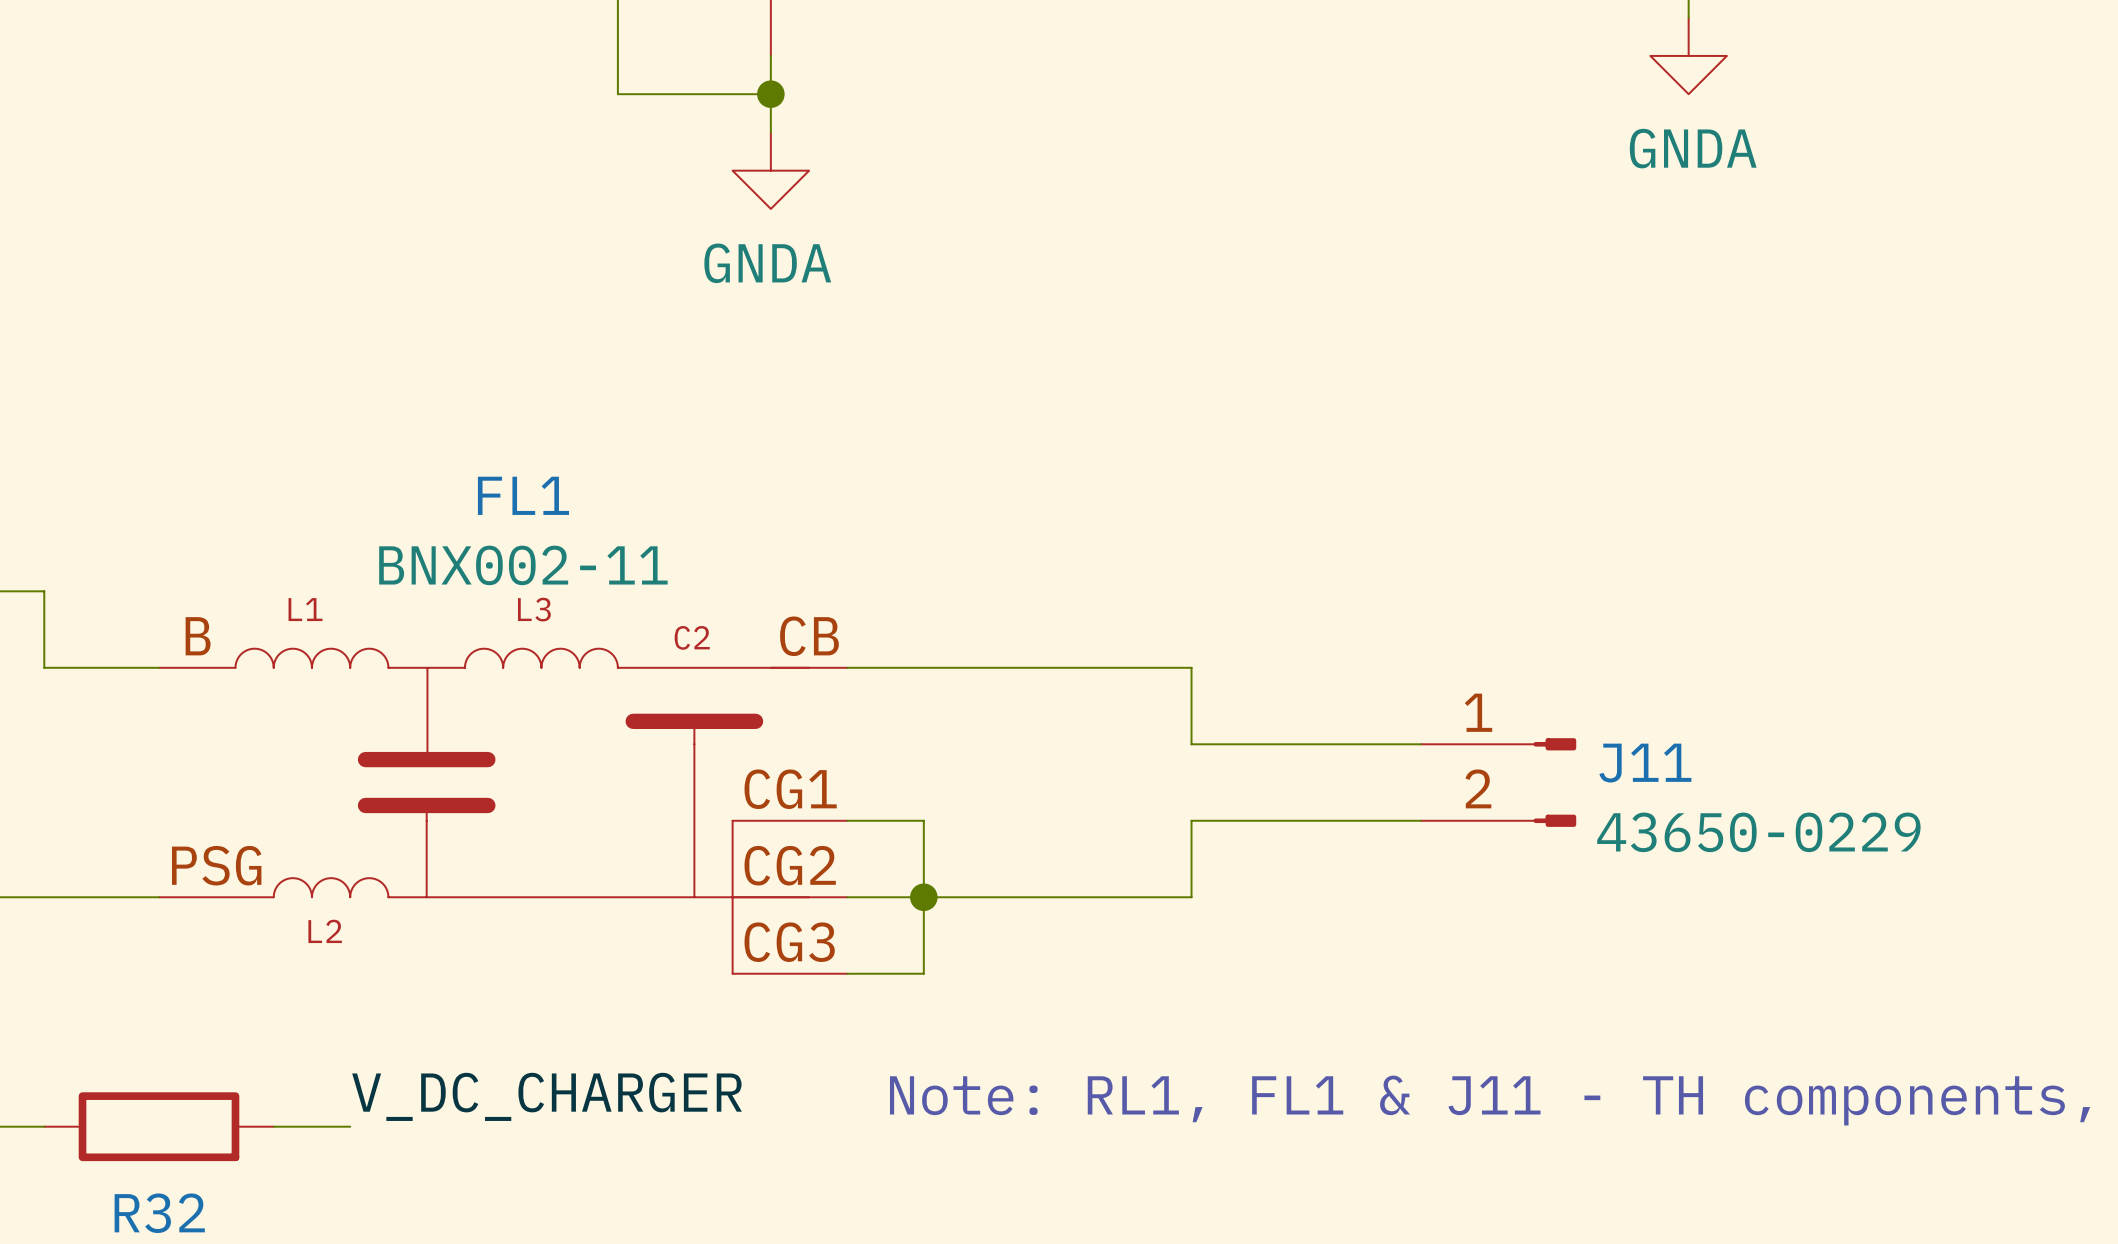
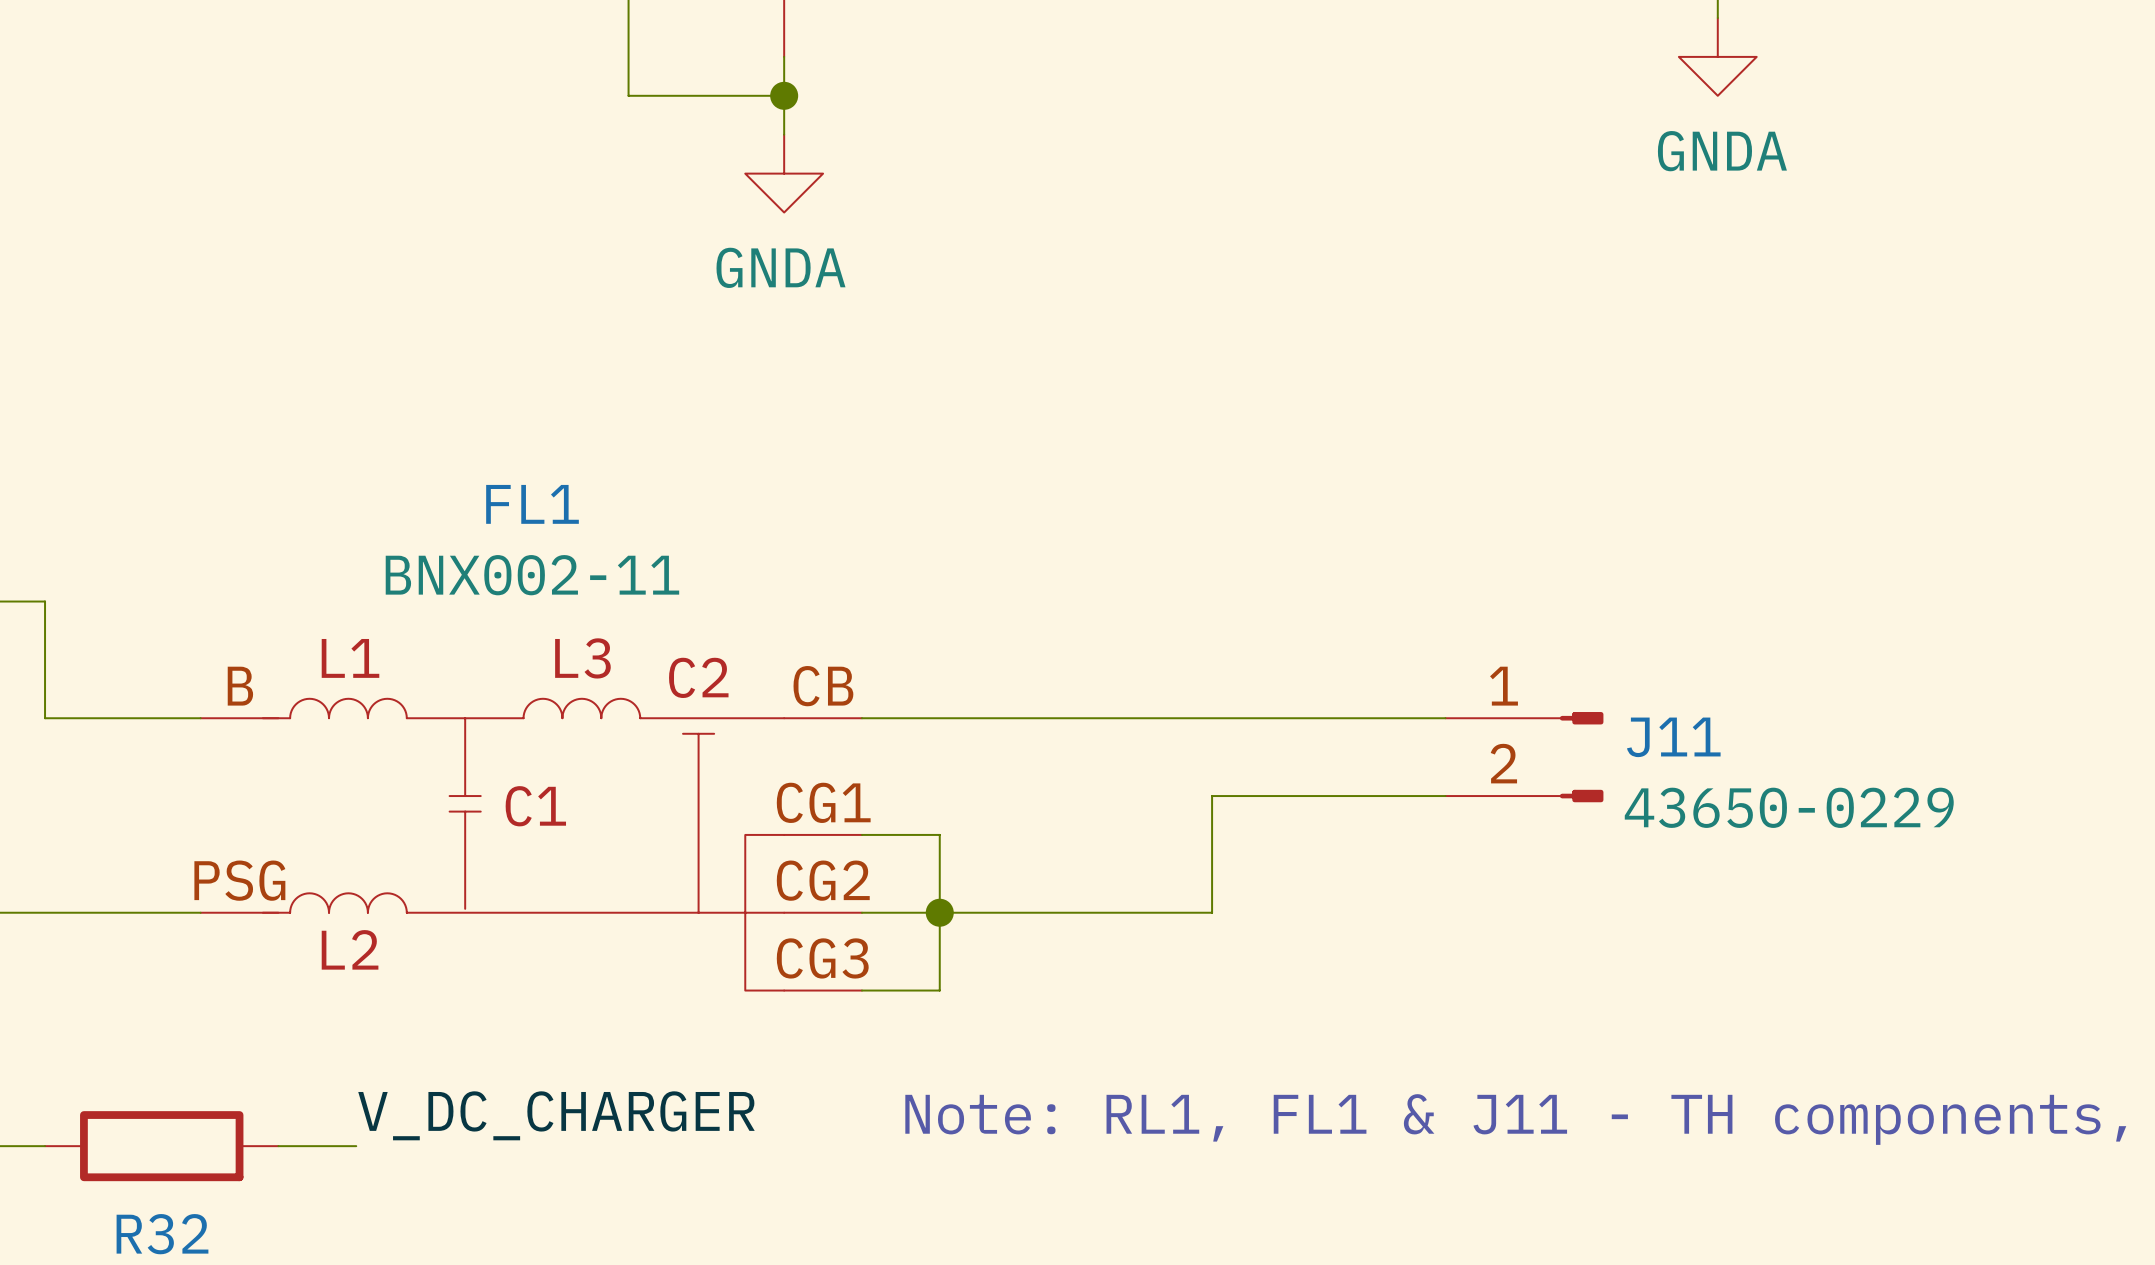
FL1 symbol: [159, 648, 886, 974] -> [200, 698, 862, 991]
wire: (44, 667) (159, 667) -> (45, 679) (45, 718) (200, 718)
wire: (847, 667) (1191, 667) (1191, 744) (1420, 744) -> none
wire: none -> (861, 718) (1445, 718)
J11 position: (1498, 782) -> (1524, 757)
wire: (1191, 820) (1420, 820) -> (1212, 834) (1212, 796) (1445, 796)

